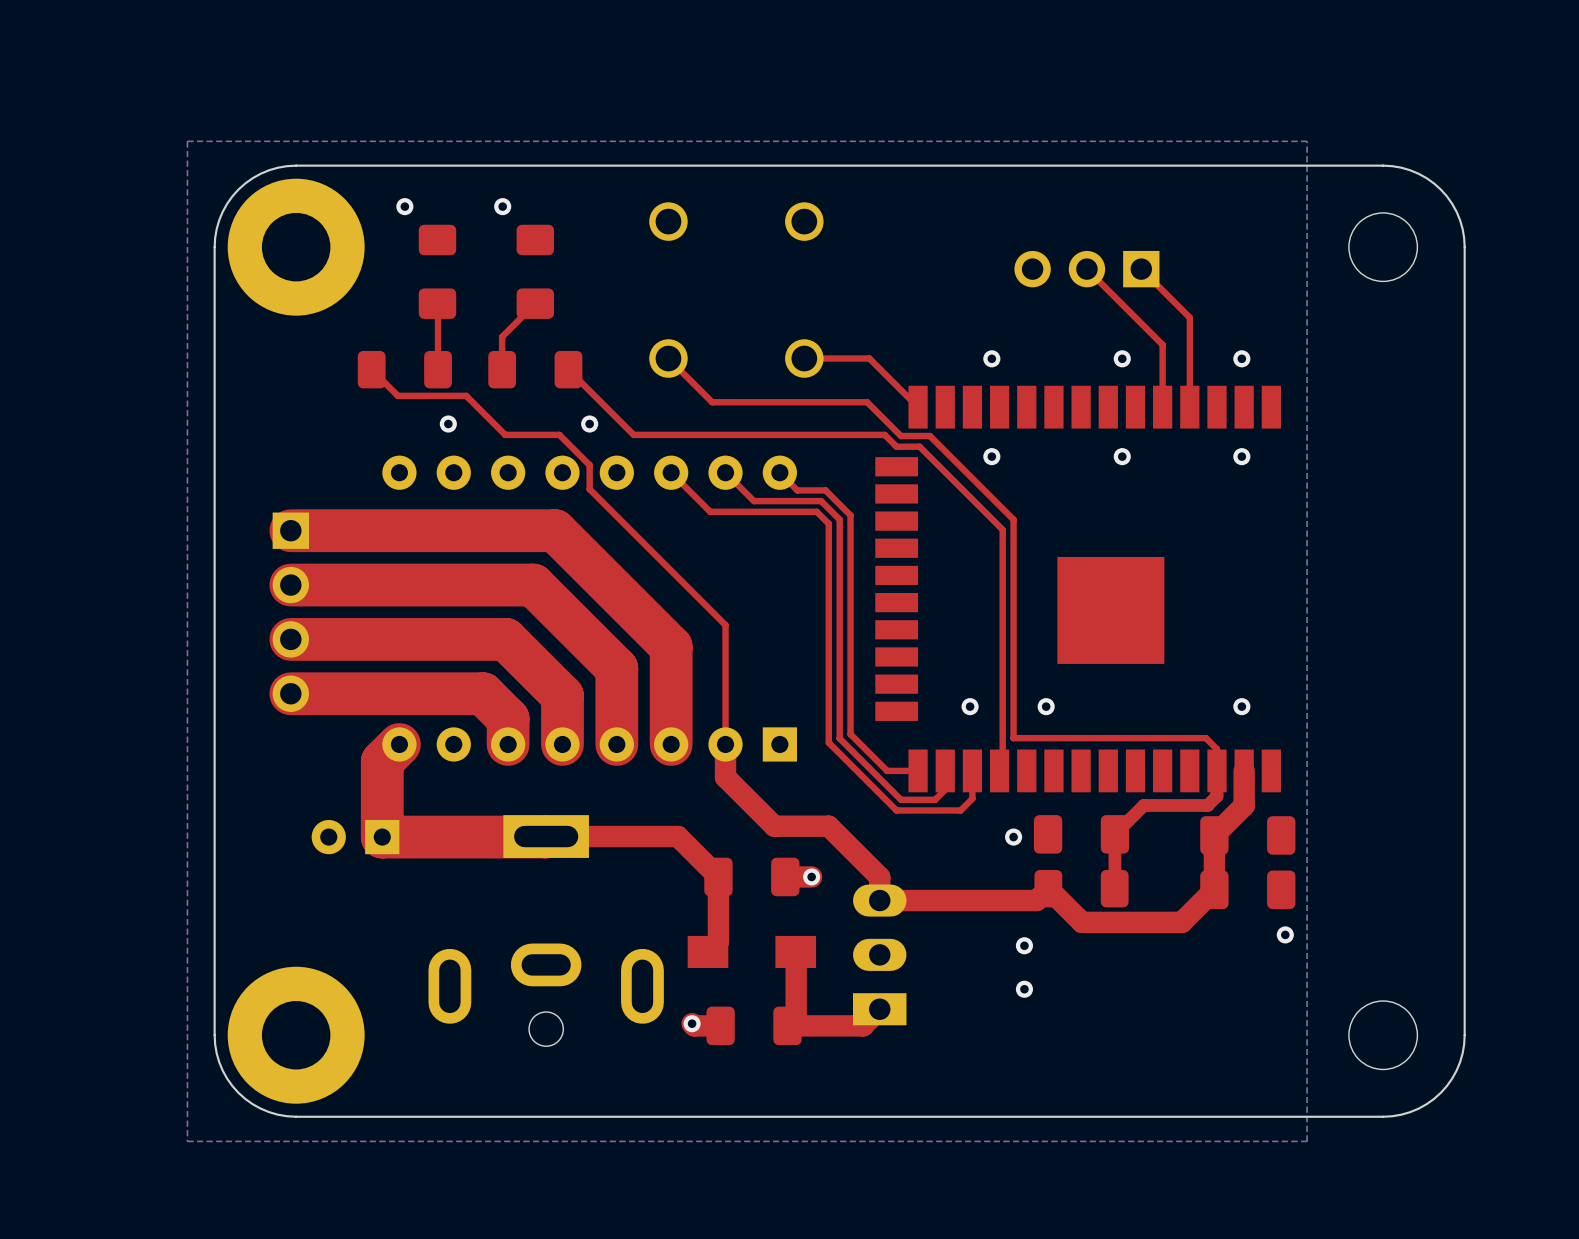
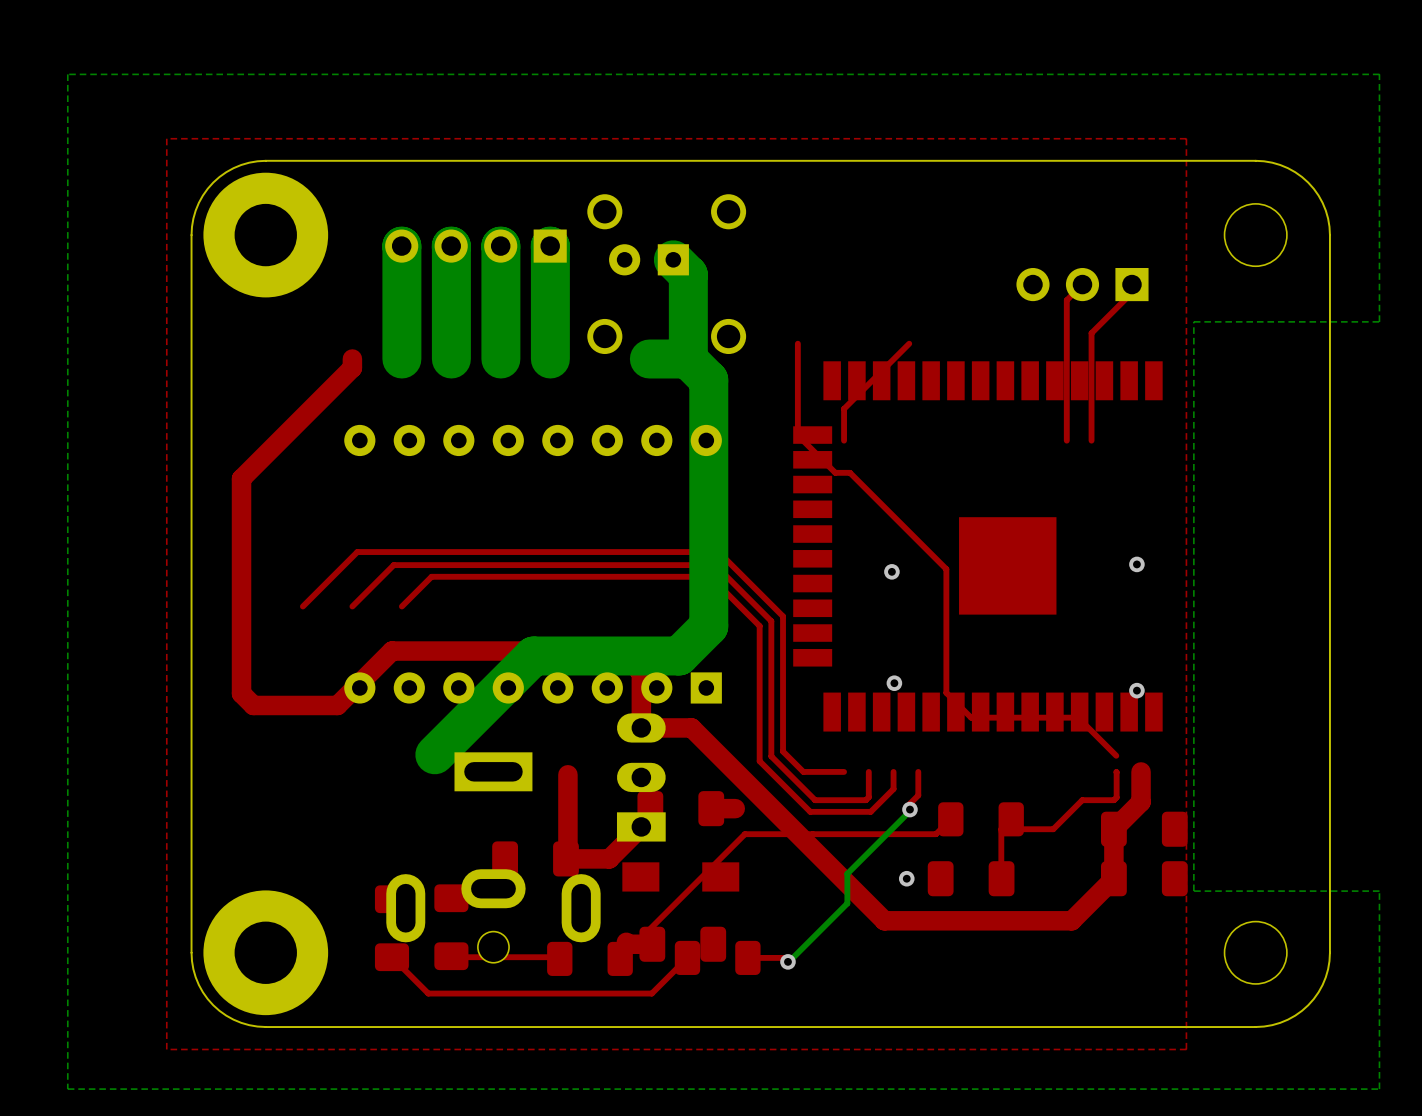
bottom zone outline: (1307, 141) (1307, 1141) (187, 1141) (187, 141) (1307, 141) -> (1379, 74) (1379, 321) (1193, 321) (1193, 891) (1379, 891) (1379, 1089) (67, 1089) (67, 74) (1379, 74)
via: (404, 206) -> none
via: (502, 206) -> none
part footprint: [516, 224, 555, 319] -> [385, 229, 567, 263]
bottom track: none -> (401, 246) (401, 359)
bottom track: none -> (451, 246) (451, 359)
bottom track: none -> (500, 246) (500, 359)
bottom track: none -> (550, 246) (550, 359)
top track: (1086, 269) (1162, 344) (1162, 407) -> none
part position: (1086, 269) -> (1082, 284)
top track: (1141, 269) (1189, 317) (1189, 407) -> none
part: (437, 271) -> none
part: none -> (648, 259)
bottom track: none -> (673, 259) (688, 274) (688, 359)
top track: none -> (1082, 284) (1066, 300) (1066, 440)
top track: (437, 303) (438, 369) -> none
top track: (535, 303) (502, 336) (502, 369) -> none
top track: none -> (1131, 292) (1091, 333) (1091, 440)
top track: (668, 358) (712, 402) (867, 402) (900, 436) (929, 436) (1013, 519) (1013, 738) (1205, 738) (1216, 749) (1216, 796) (1207, 805) (1143, 805) (1114, 834) (1114, 888) -> none
top track: (804, 358) (869, 358) (918, 407) -> none
via: (991, 358) -> none
via: (1122, 358) -> none
via: (1241, 358) -> none
top track: none -> (797, 343) (797, 435) (835, 472) (850, 472) (946, 569) (946, 692) (971, 717) (1078, 717) (1116, 755)
top track: none -> (909, 343) (844, 408) (844, 440)
top track: (371, 369) (397, 395) (466, 395) (505, 434) (559, 434) (589, 465) (589, 489) (725, 625) (725, 777) (774, 826) (828, 826) (879, 877) (879, 900) (1036, 900) -> (620, 958) (744, 834) (935, 834) (940, 830)
part: (404, 369) -> none
part: (535, 369) -> none
top track: (568, 369) (633, 434) (884, 434) (896, 446) (919, 446) (1002, 529) (1002, 767) (999, 770) -> none
top track: none -> (352, 359) (352, 367) (241, 478) (241, 693) (253, 705) (337, 705) (392, 651) (619, 651) (641, 672) (641, 727)
bottom track: none -> (649, 359) (687, 359) (708, 380) (708, 626) (679, 655) (533, 655) (434, 754)
via: (448, 424) -> none
via: (589, 424) -> none
via: (991, 456) -> none
via: (1122, 456) -> none
via: (1241, 456) -> none
top track: (671, 472) (710, 511) (816, 511) (828, 523) (828, 742) (896, 810) (960, 810) (972, 798) (972, 770) -> none
top track: (725, 472) (753, 501) (821, 501) (839, 519) (839, 738) (900, 799) (935, 799) (945, 789) (945, 770) -> none
top track: (779, 472) (797, 490) (825, 490) (850, 515) (850, 734) (887, 770) (918, 770) -> none
top track: (290, 530) (555, 530) (671, 646) (671, 744) -> none
top track: (290, 585) (533, 585) (616, 668) (616, 744) -> none
via: none -> (1136, 564)
part: (290, 612) -> none
via: none -> (891, 571)
top track: (290, 639) (505, 639) (562, 696) (562, 744) -> none
top track: none -> (302, 606) (357, 552) (718, 552) (783, 616) (783, 751) (803, 771) (844, 771)
top track: none -> (352, 606) (393, 565) (715, 565) (771, 621) (771, 756) (815, 800) (865, 800) (868, 797) (868, 771)
top track: none -> (401, 606) (431, 576) (710, 576) (759, 626) (759, 761) (810, 811) (870, 811) (893, 789) (893, 771)
top track: (290, 693) (483, 693) (508, 718) (508, 744) -> none
via: (970, 706) -> none
via: (1046, 706) -> none
via position: (1241, 706) -> (1136, 690)
via: none -> (894, 683)
top track: (399, 744) (382, 761) (382, 837) (678, 836) (718, 876) (718, 941) (708, 951) -> none
top track: (1244, 770) (1244, 805) (1214, 835) (1214, 889) (1181, 922) (1082, 922) (1048, 888) (1037, 899) -> none
top track: none -> (651, 727) (691, 727) (884, 920) (1071, 920) (1113, 878) (1113, 829) (1141, 802) (1141, 771)
part: (1081, 834) -> none
part: (1247, 835) -> none
top track: none -> (918, 771) (918, 795) (909, 803) (909, 809)
top track: none -> (1116, 771) (1116, 797) (1114, 800) (1082, 800) (1053, 829) (1001, 829) (1001, 878)
part: (355, 837) -> none
via: (1013, 837) -> none
top track: none -> (567, 774) (567, 856) (565, 858) (609, 858) (641, 826)
via: (811, 876) -> none
bottom track: none -> (909, 809) (847, 873) (847, 903) (787, 961)
via: none -> (909, 809)
part position: (1247, 889) -> (1144, 829)
part: none -> (535, 858)
via: (1285, 934) -> none
via: (1024, 945) -> none
top track: (795, 951) (796, 1017) (787, 1025) (863, 1025) (879, 1009) -> none
via: none -> (906, 878)
part: none -> (971, 878)
part: none -> (1144, 878)
part position: (879, 954) -> (641, 777)
via: (1024, 989) -> none
part: none -> (451, 927)
part: none -> (392, 928)
via: (692, 1023) -> none
top track: none -> (392, 957) (428, 993) (651, 993) (687, 957)
top track: none -> (558, 957) (441, 957)
part: none -> (717, 957)
top track: none -> (747, 957) (784, 957) (787, 961)
part: none -> (589, 958)
via: none -> (787, 961)

